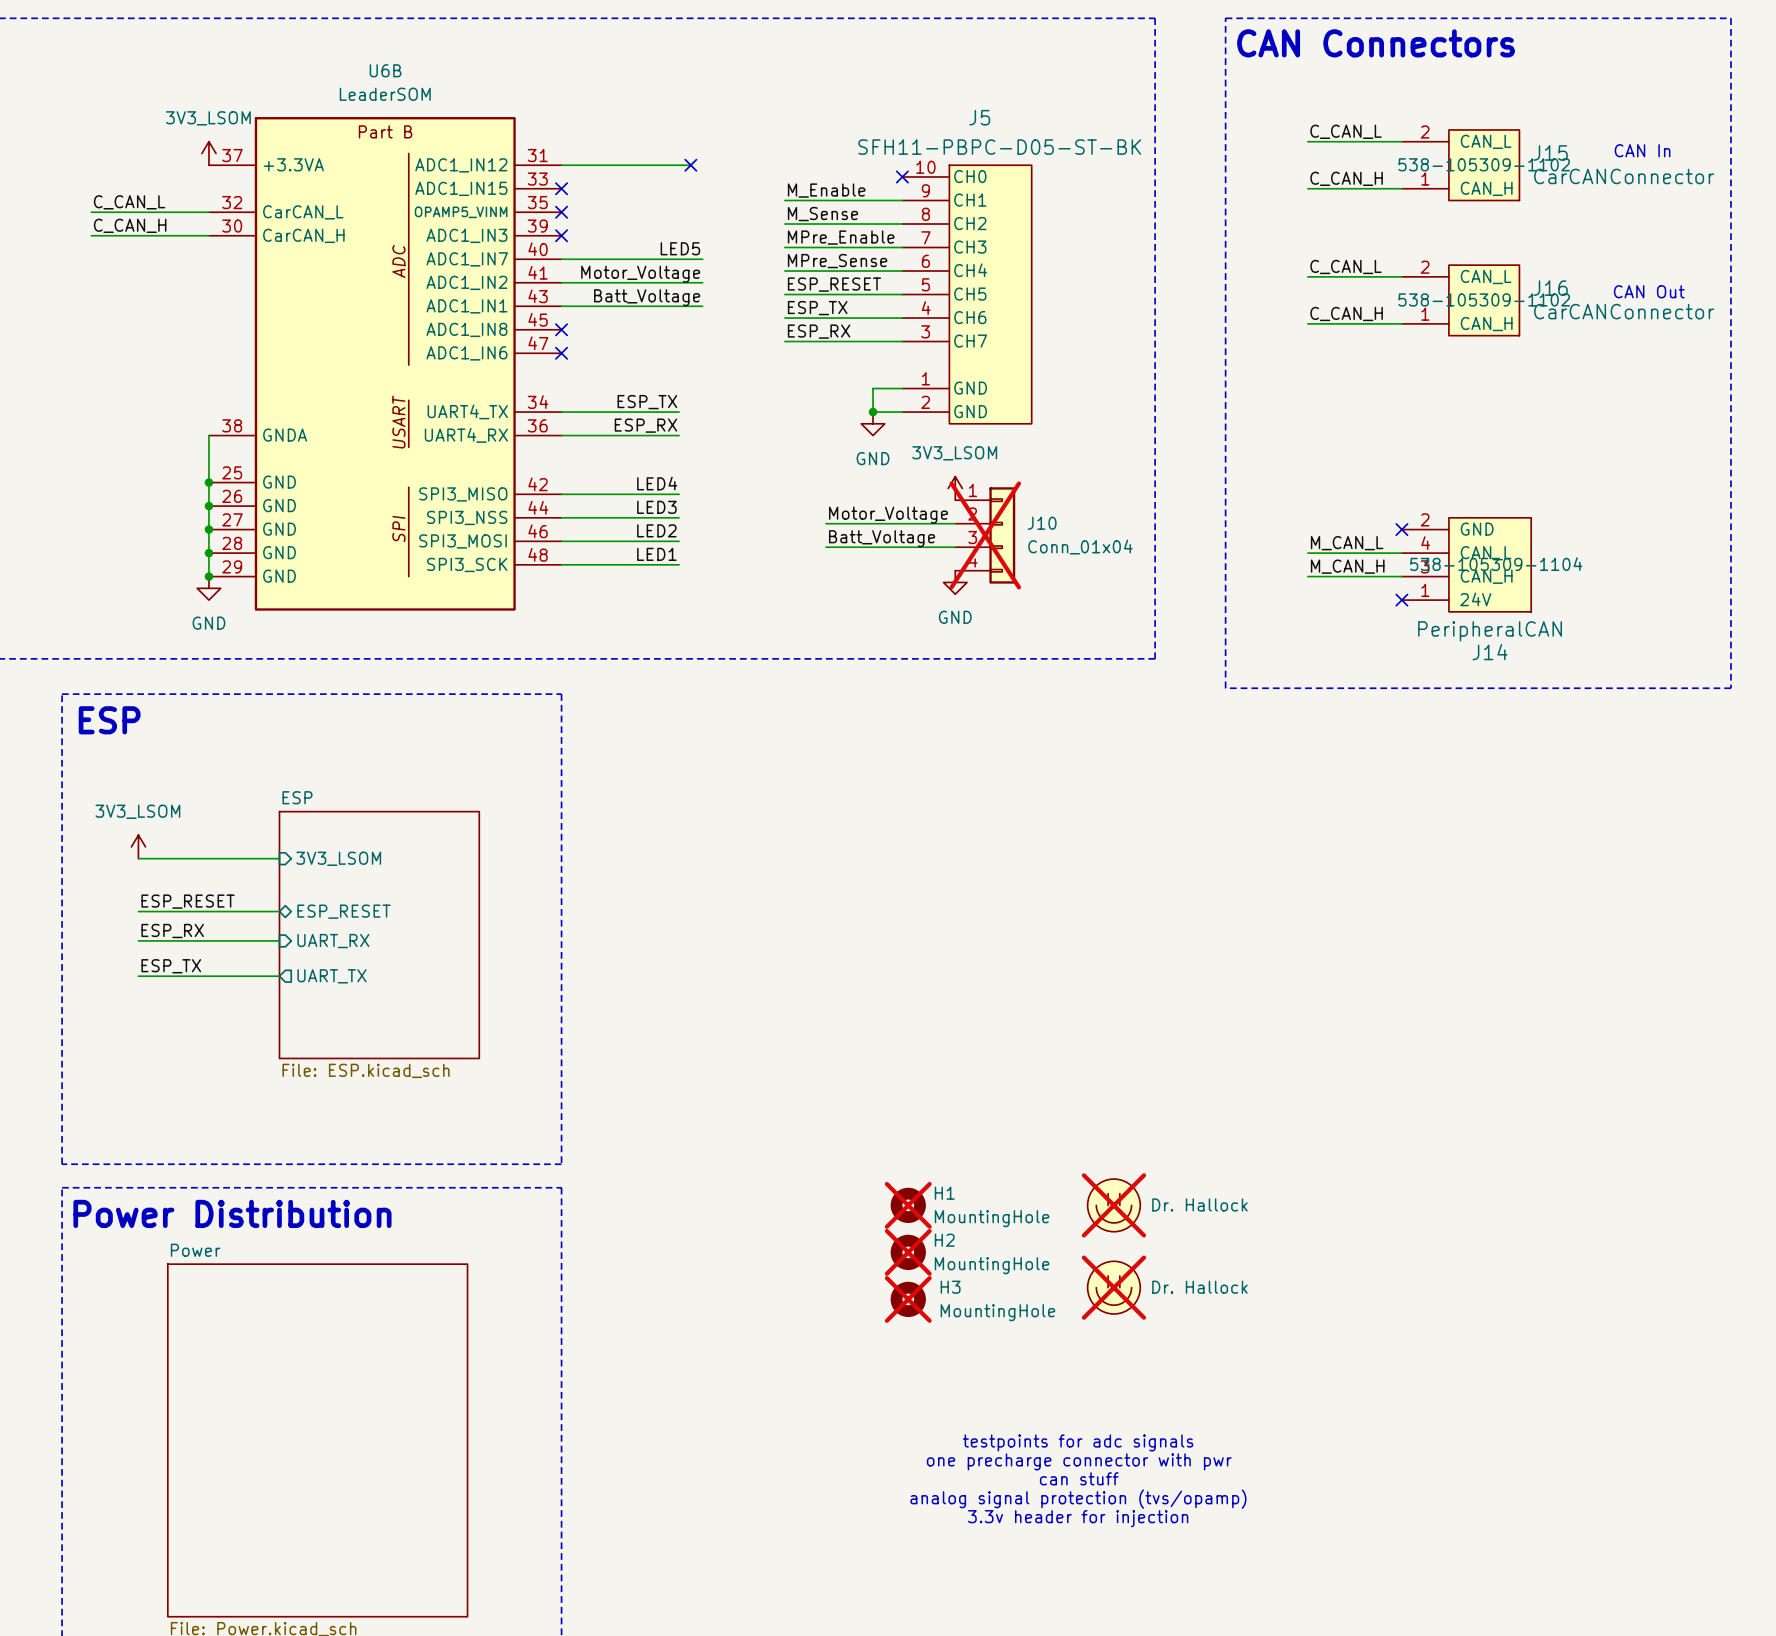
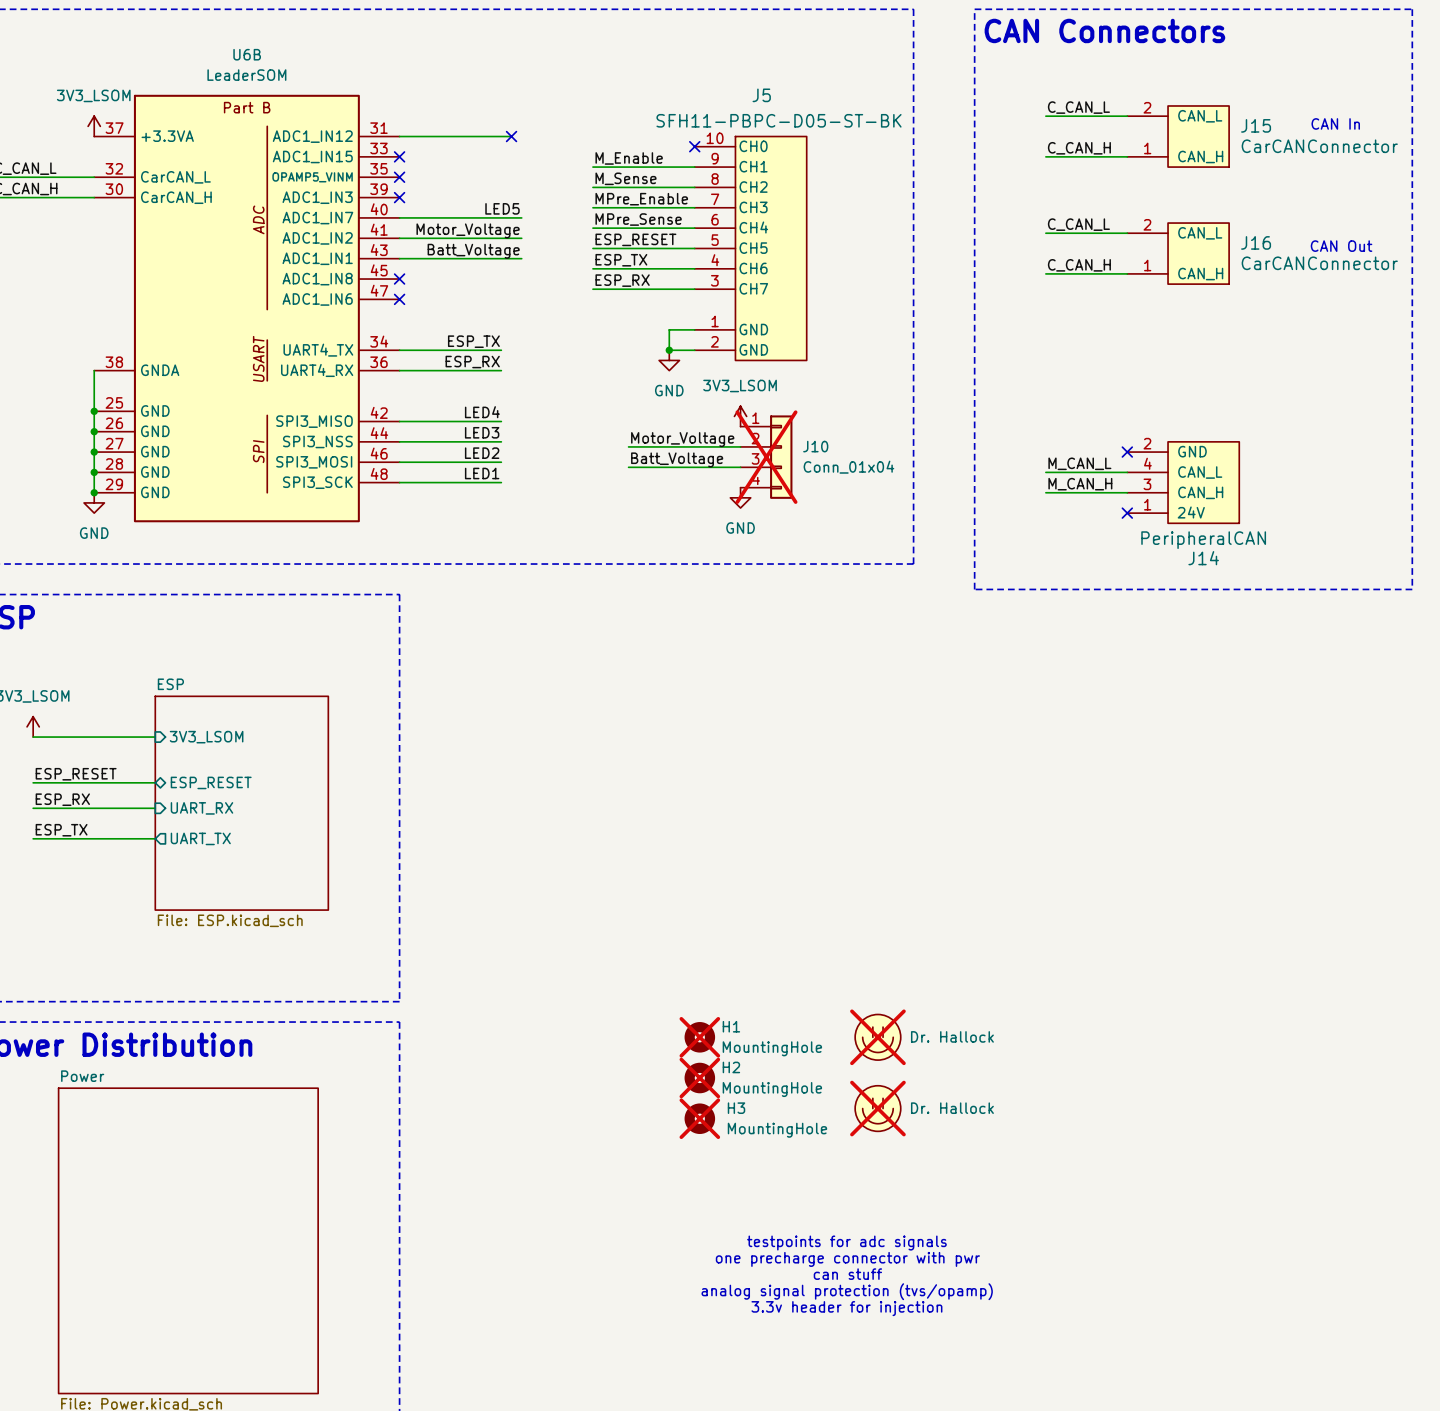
J15 text: 538-105309-1102 (1484, 164) -> none
J16 text: 538-105309-1102 (1484, 299) -> none
J14 text: 538-105309-1104 (1496, 564) -> none

